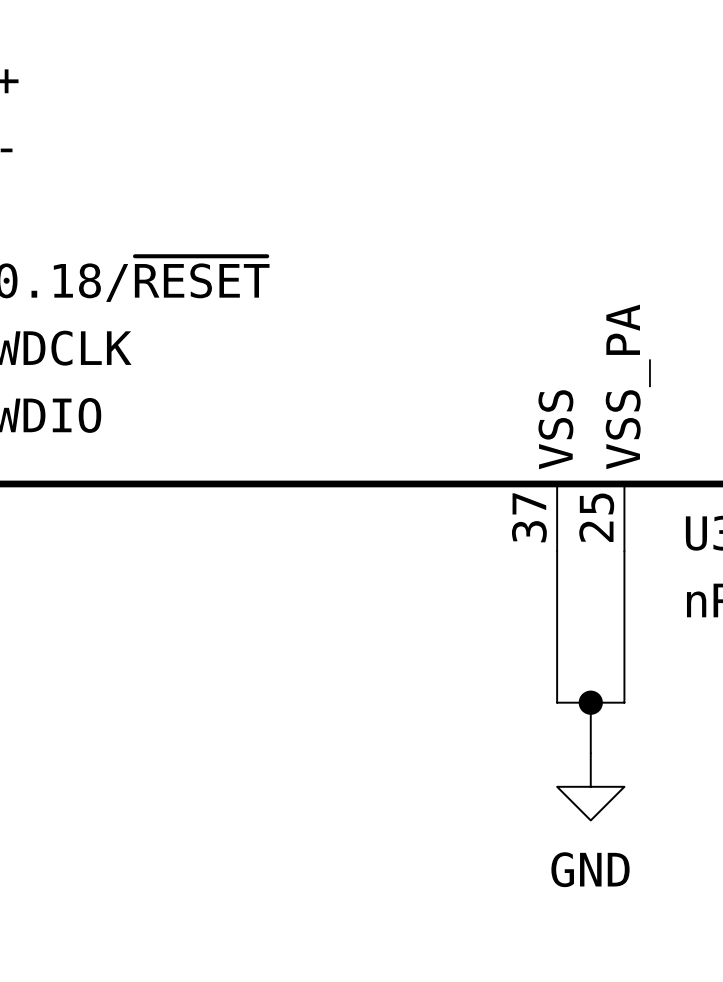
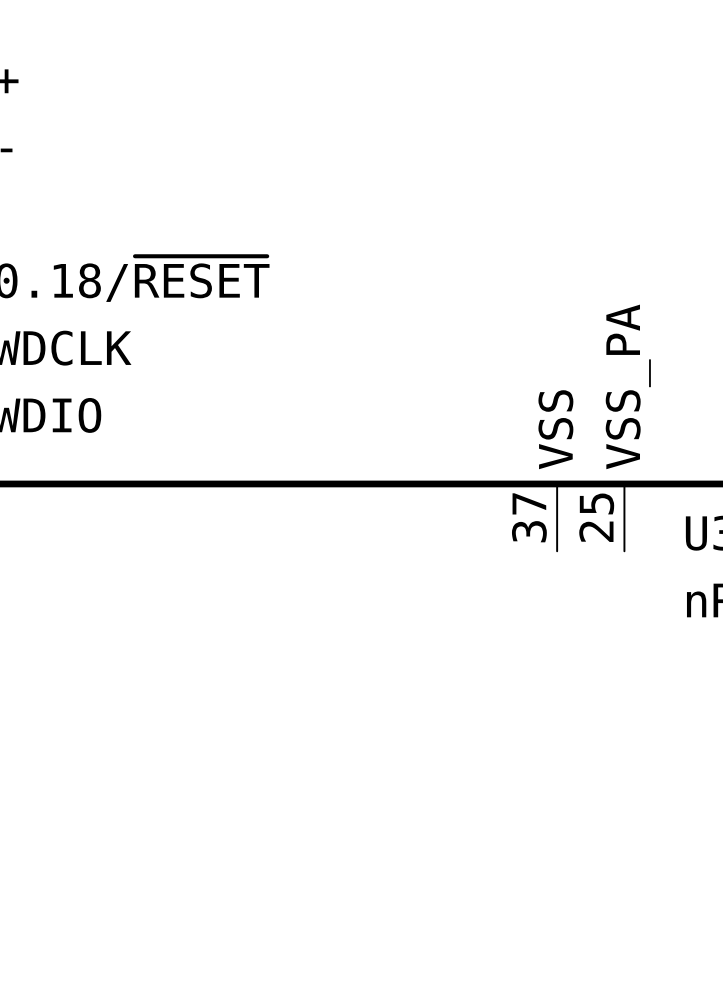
wire: (557, 551) (557, 702) (624, 702) (624, 551) -> none
wire: (590, 702) (590, 753) -> none
junction: (590, 702) -> none
power symbol: GND (590, 786) -> none

